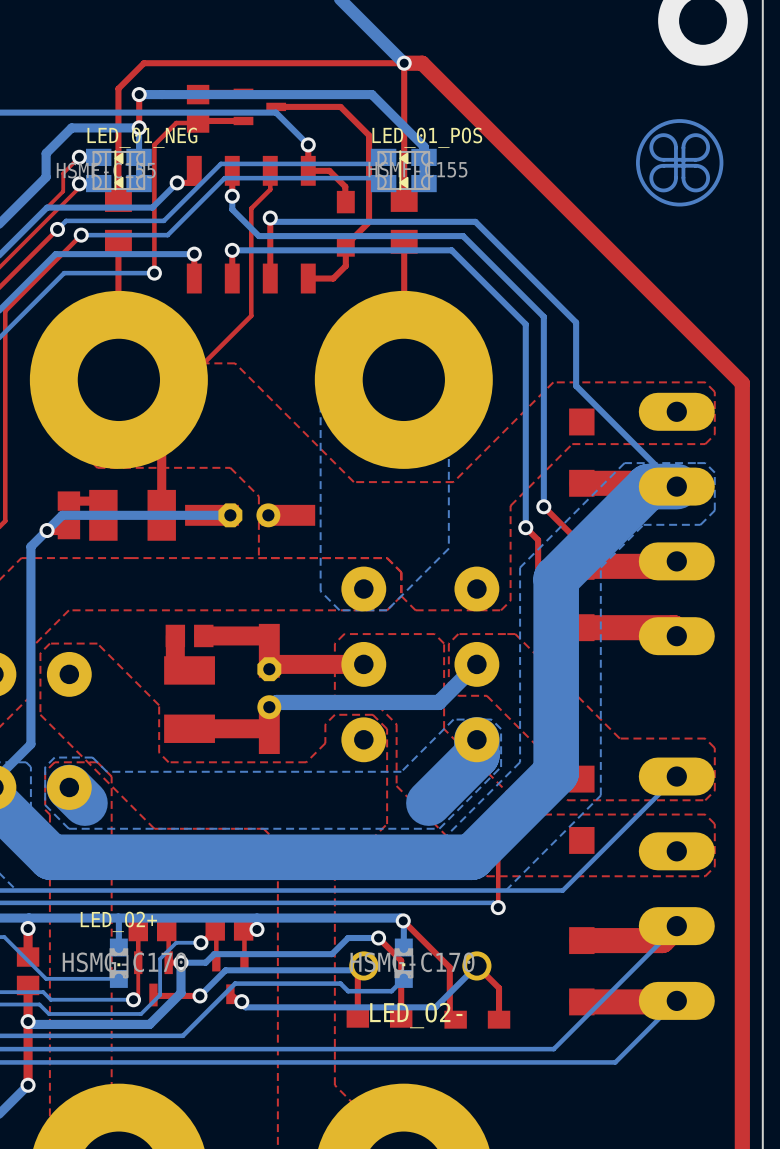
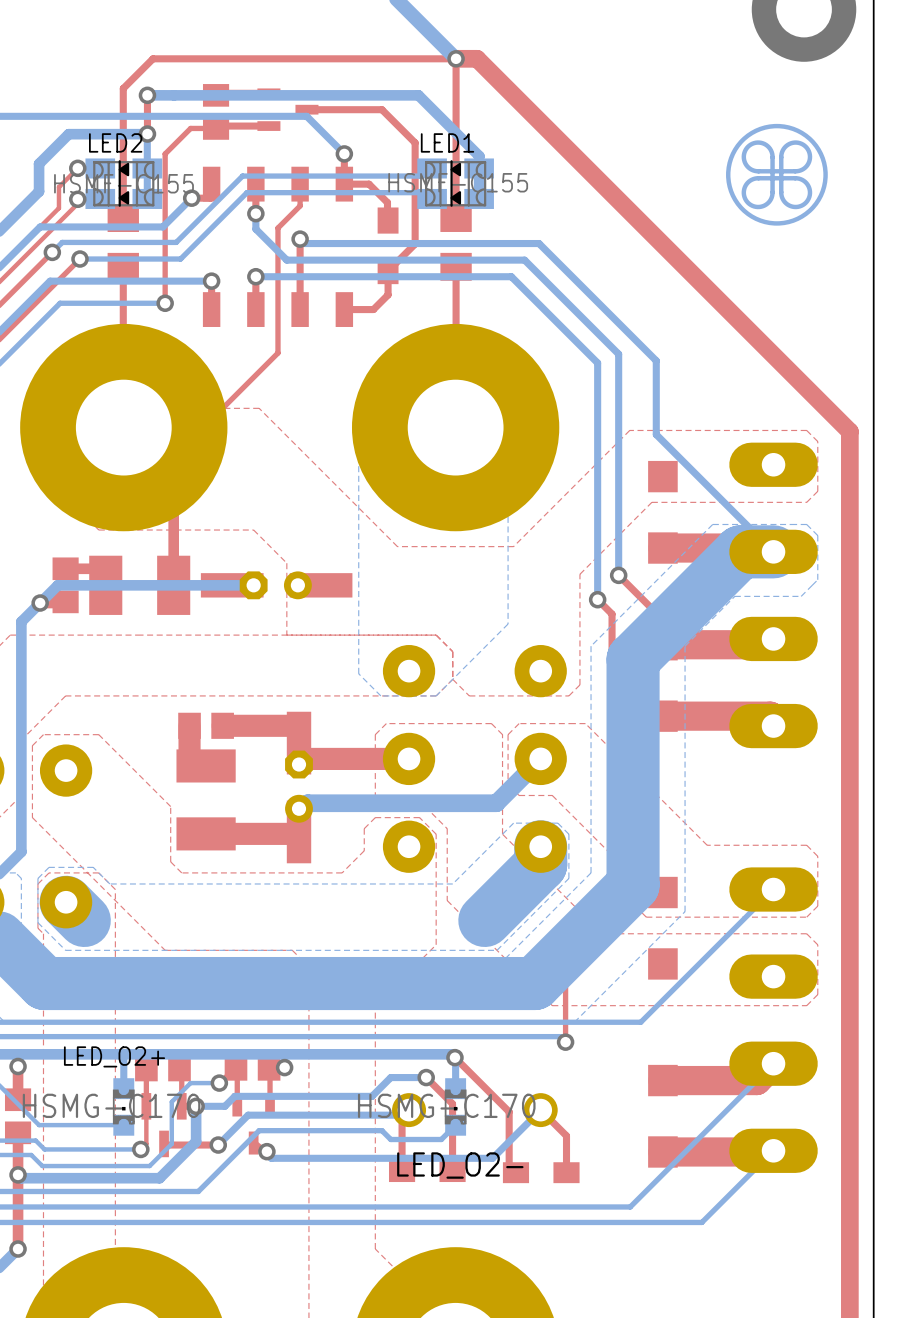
LED_01_NEG name: LED_01_NEG (142, 137) -> LED2 (115, 142)
LED_01_POS name: LED_01_POS (427, 137) -> LED1 (447, 142)

